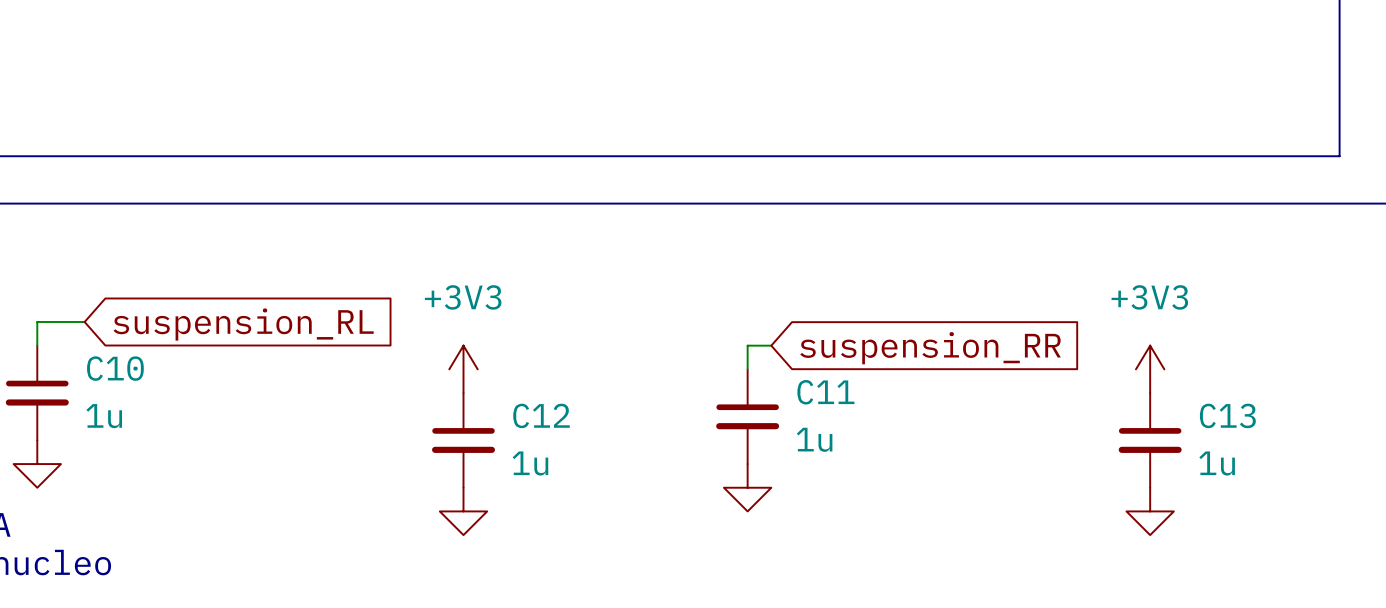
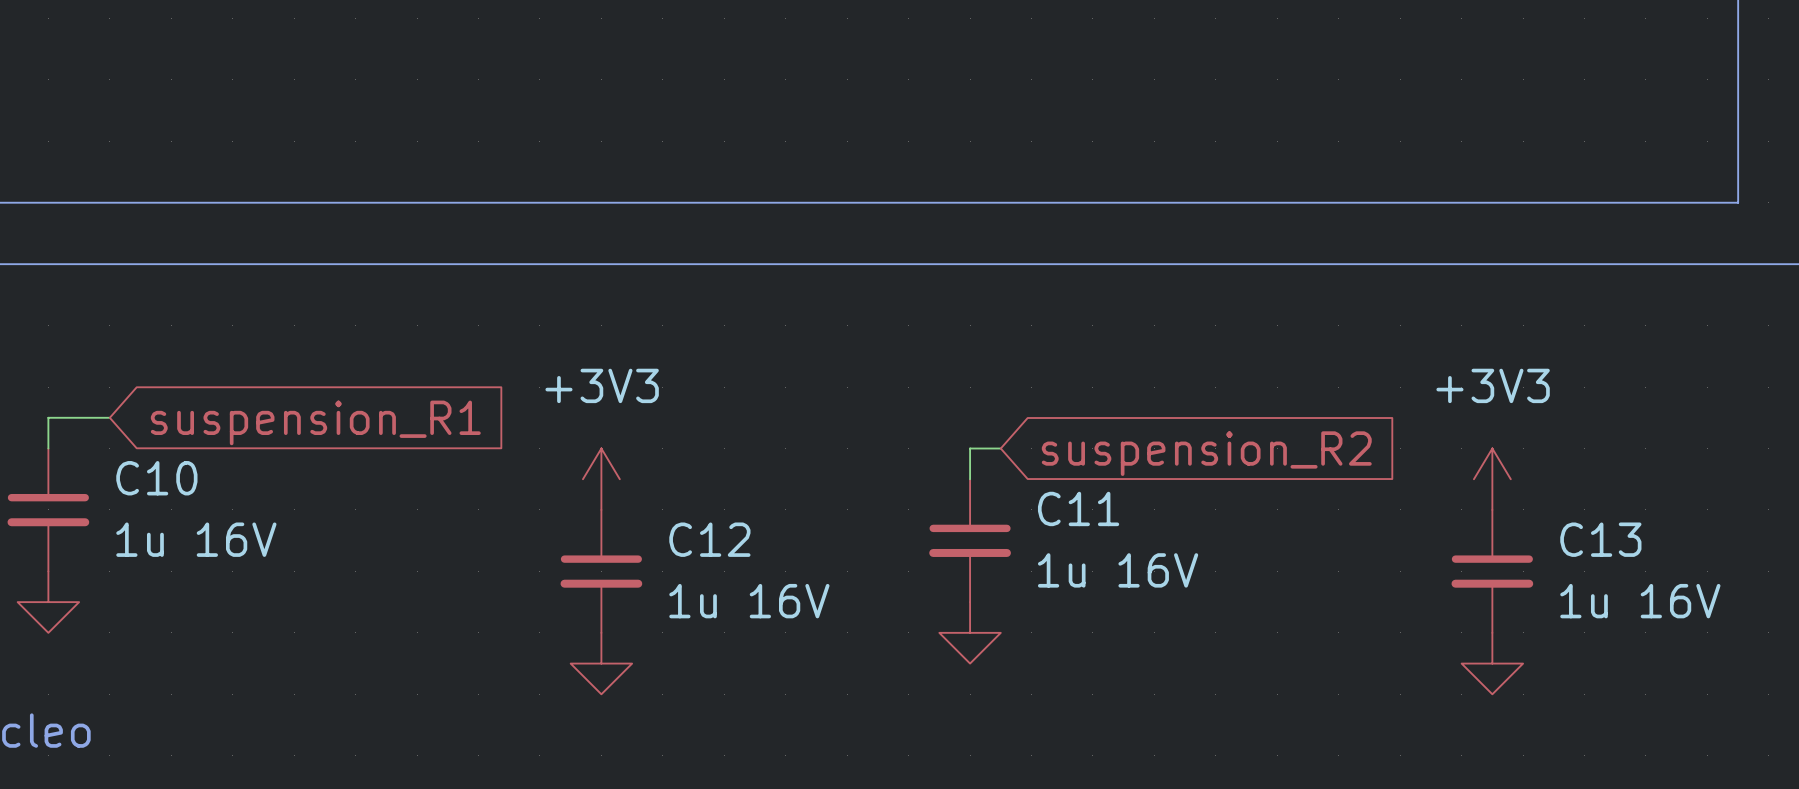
global label: suspension_RL (243, 324) -> suspension_R1 (315, 422)
global label: suspension_RR (930, 348) -> suspension_R2 (1206, 453)
C10 value: 1u (104, 416) -> 1u 16V (196, 539)
C11 value: 1u (814, 439) -> 1u 16V (1118, 570)
C12 value: 1u (530, 463) -> 1u 16V (749, 601)
C13 value: 1u (1217, 463) -> 1u 16V (1640, 601)

